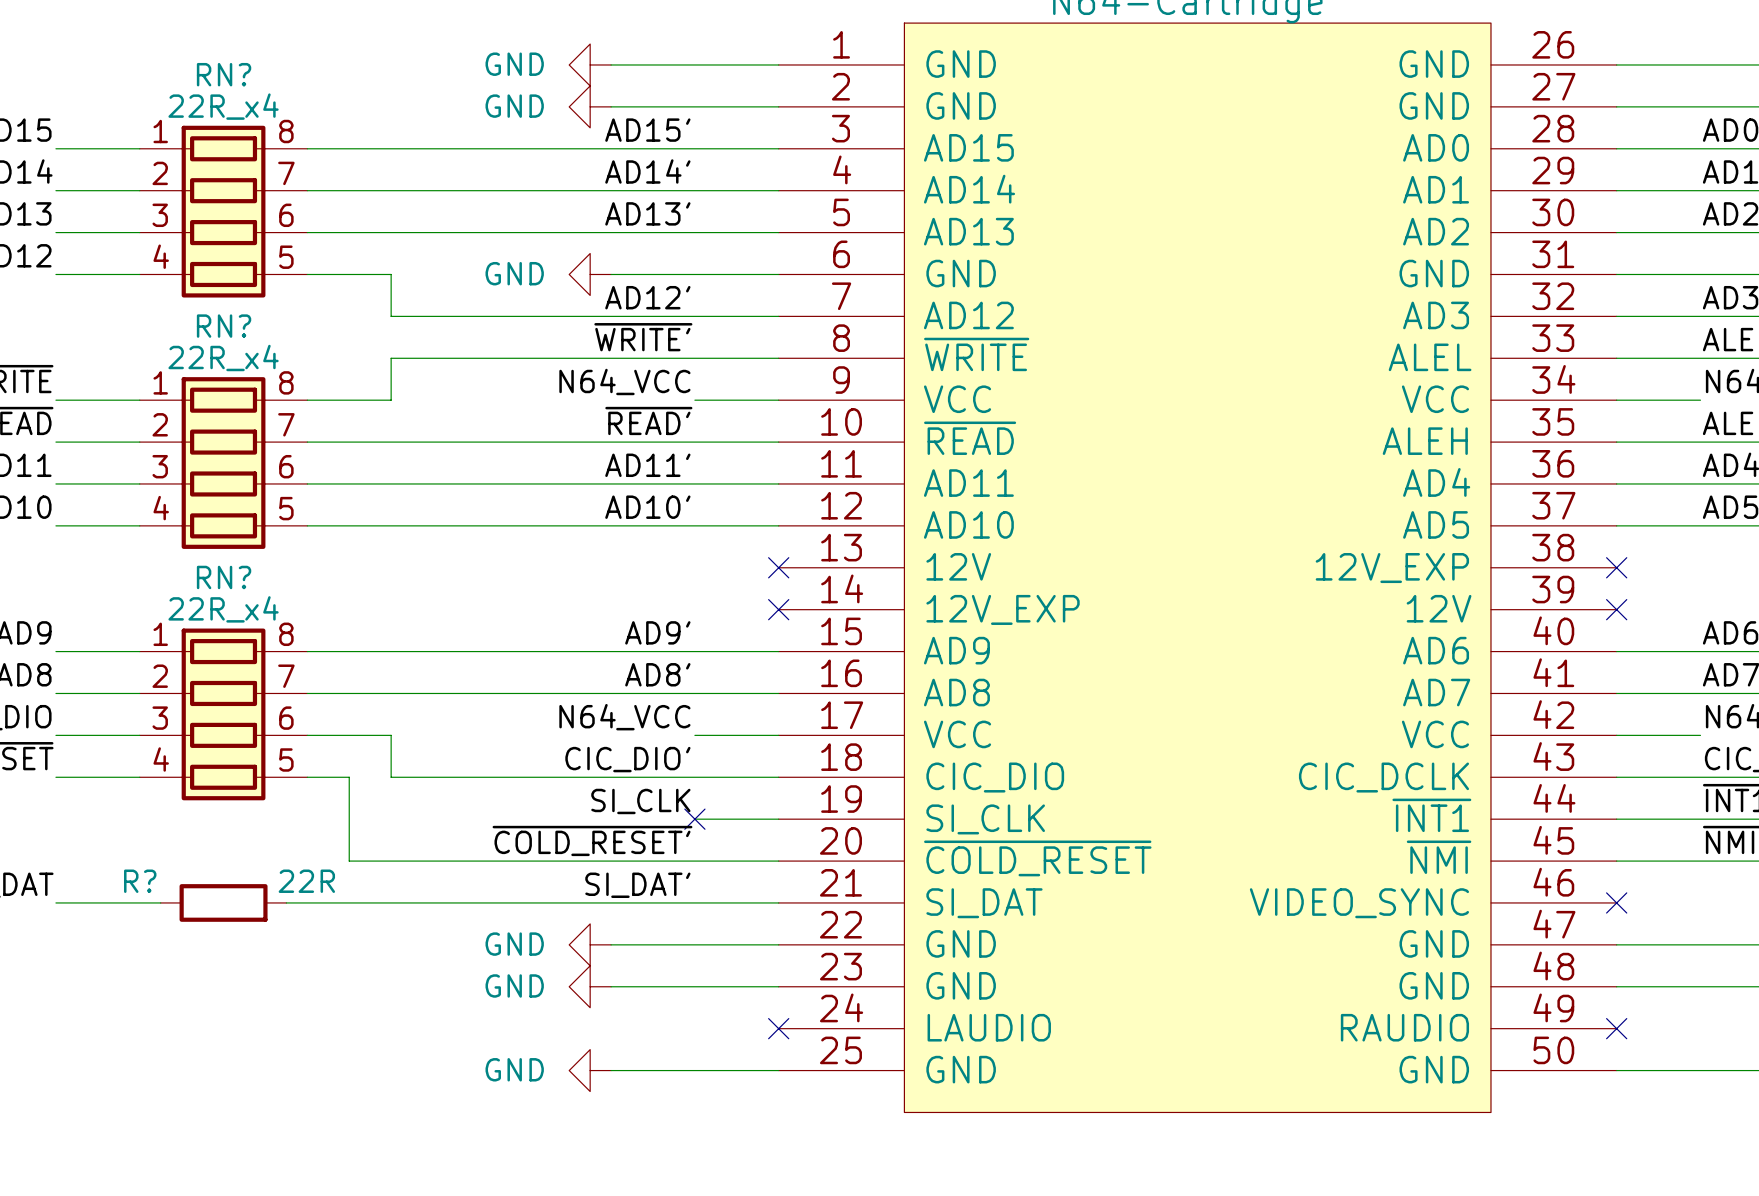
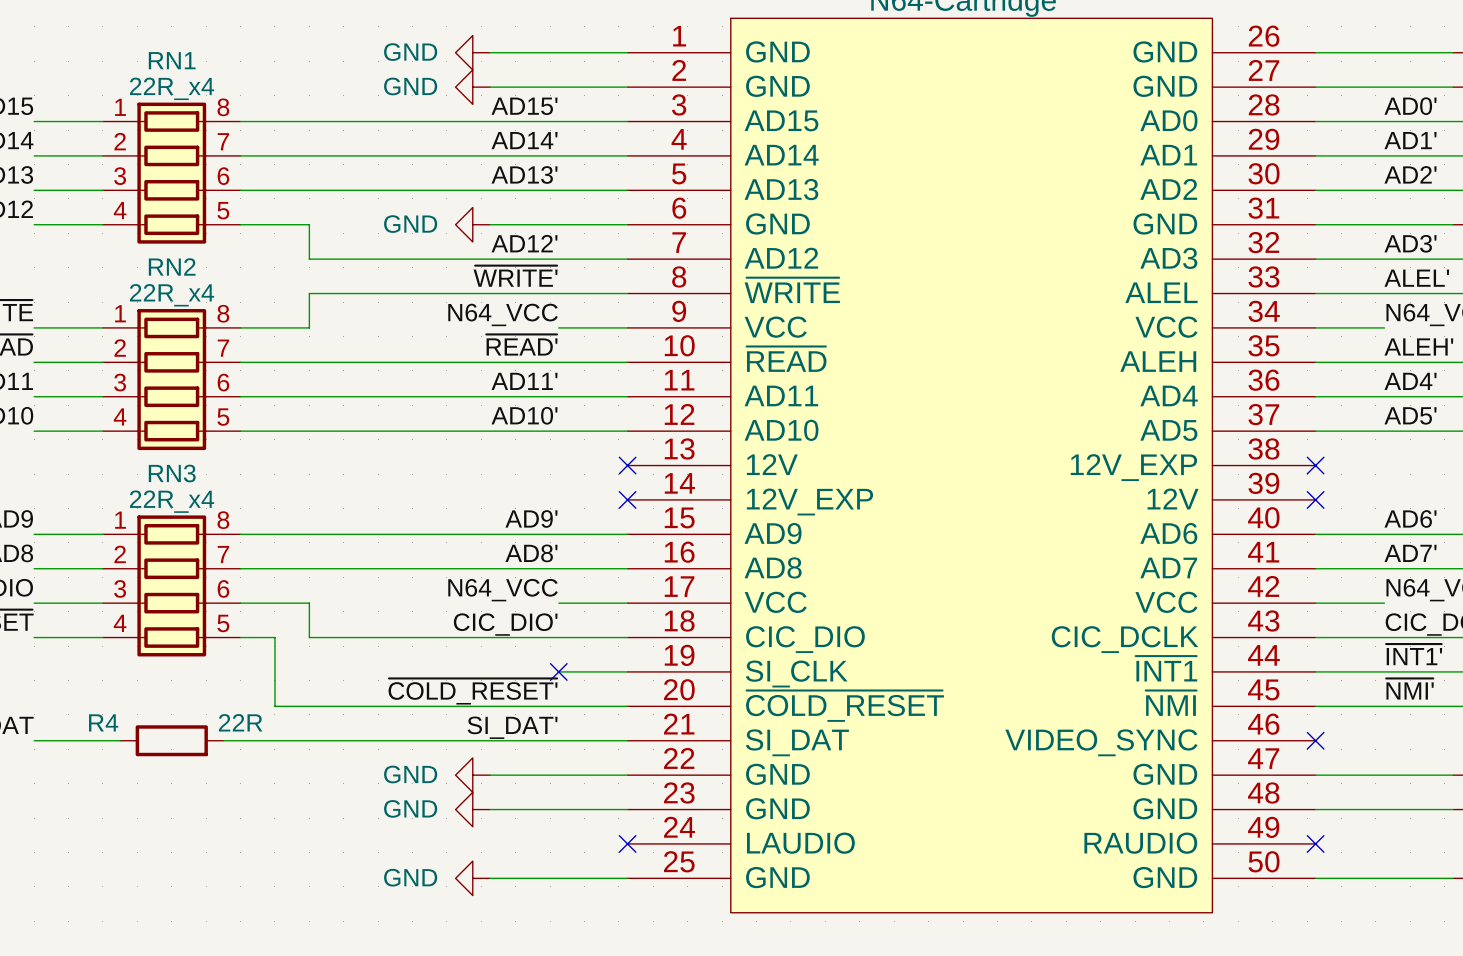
RN? name: RN? (224, 74) -> RN1 (172, 60)
RN? name: RN? (224, 326) -> RN2 (172, 266)
RN? name: RN? (224, 577) -> RN3 (172, 473)
label: SI_CLK (640, 801) -> none
R? name: R? (140, 881) -> R4 (103, 722)

